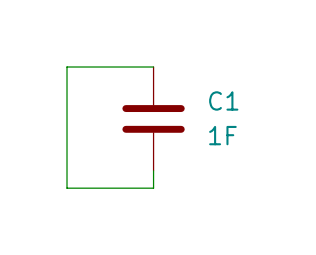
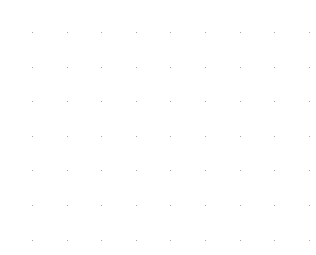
wire: (153, 67) (67, 67) (67, 188) (153, 188) (153, 170) -> none
C1: 1F (153, 118) -> none

